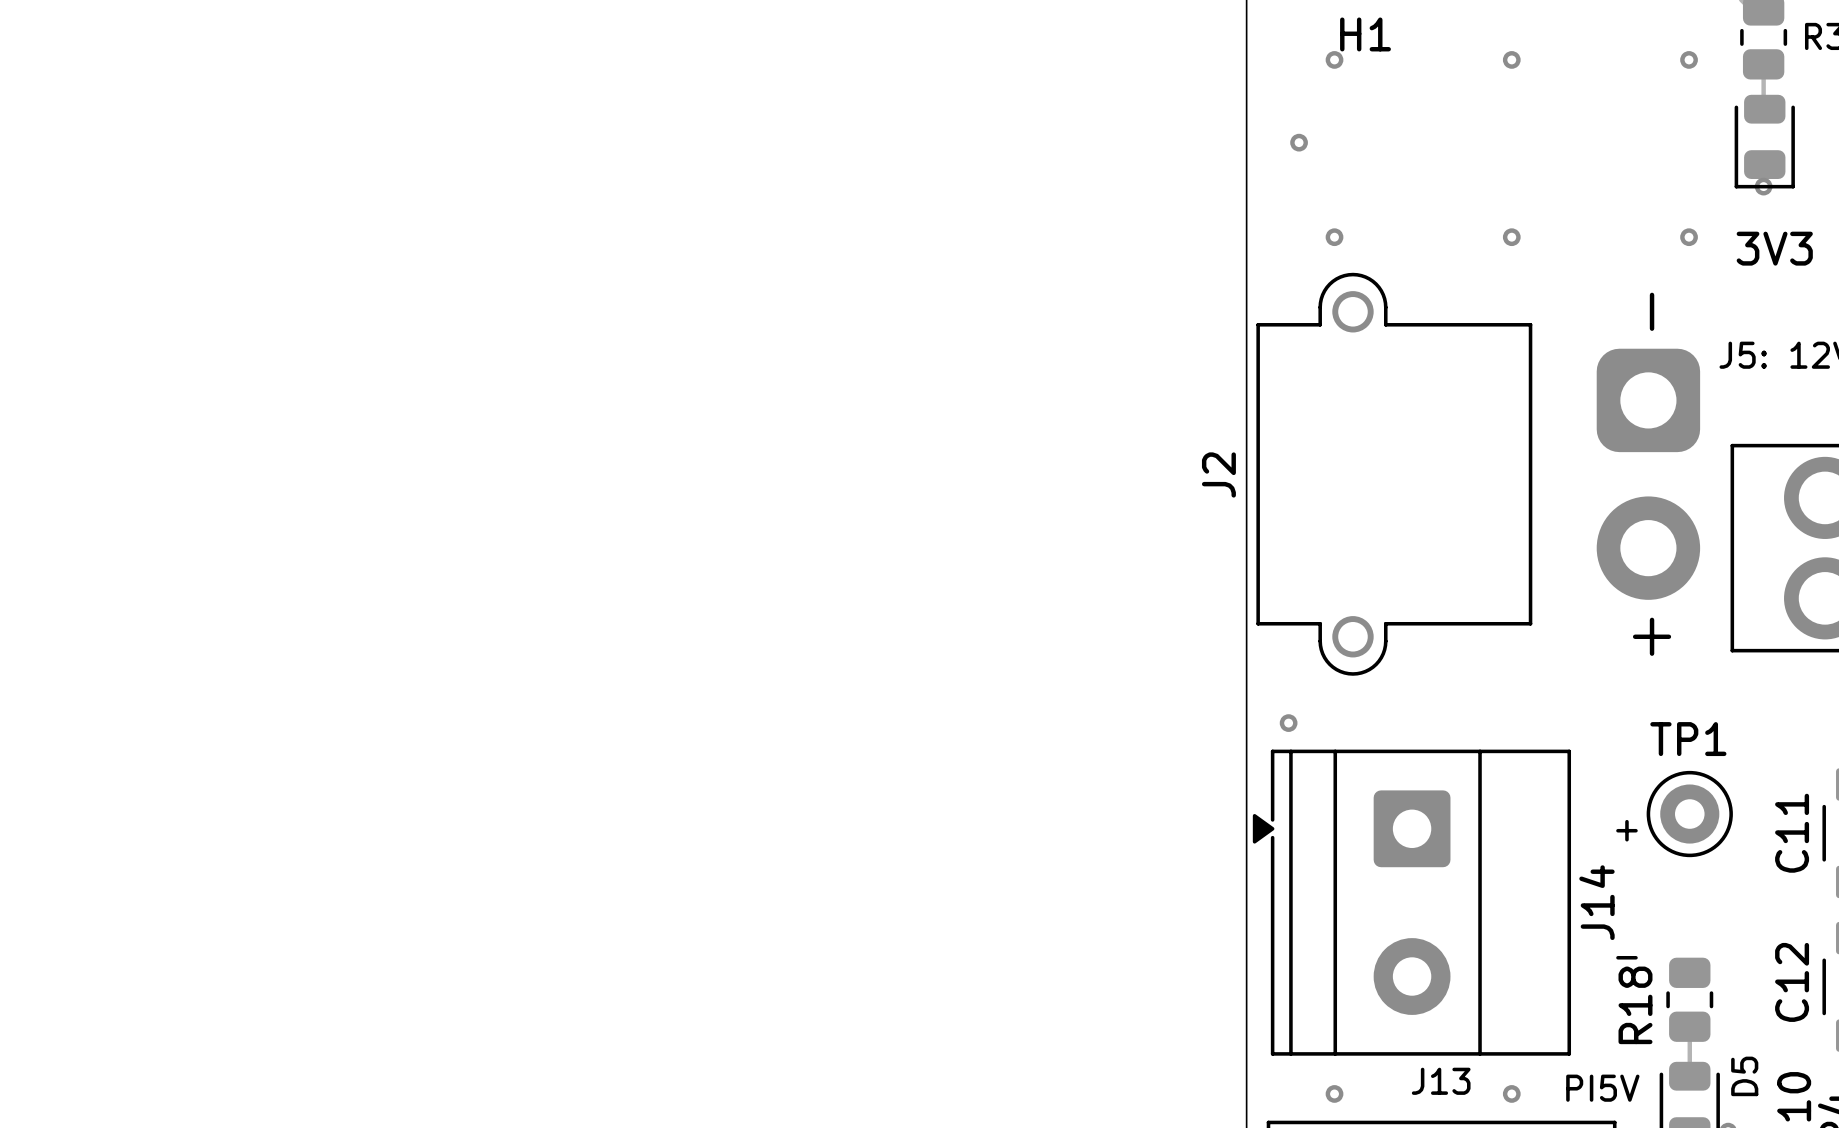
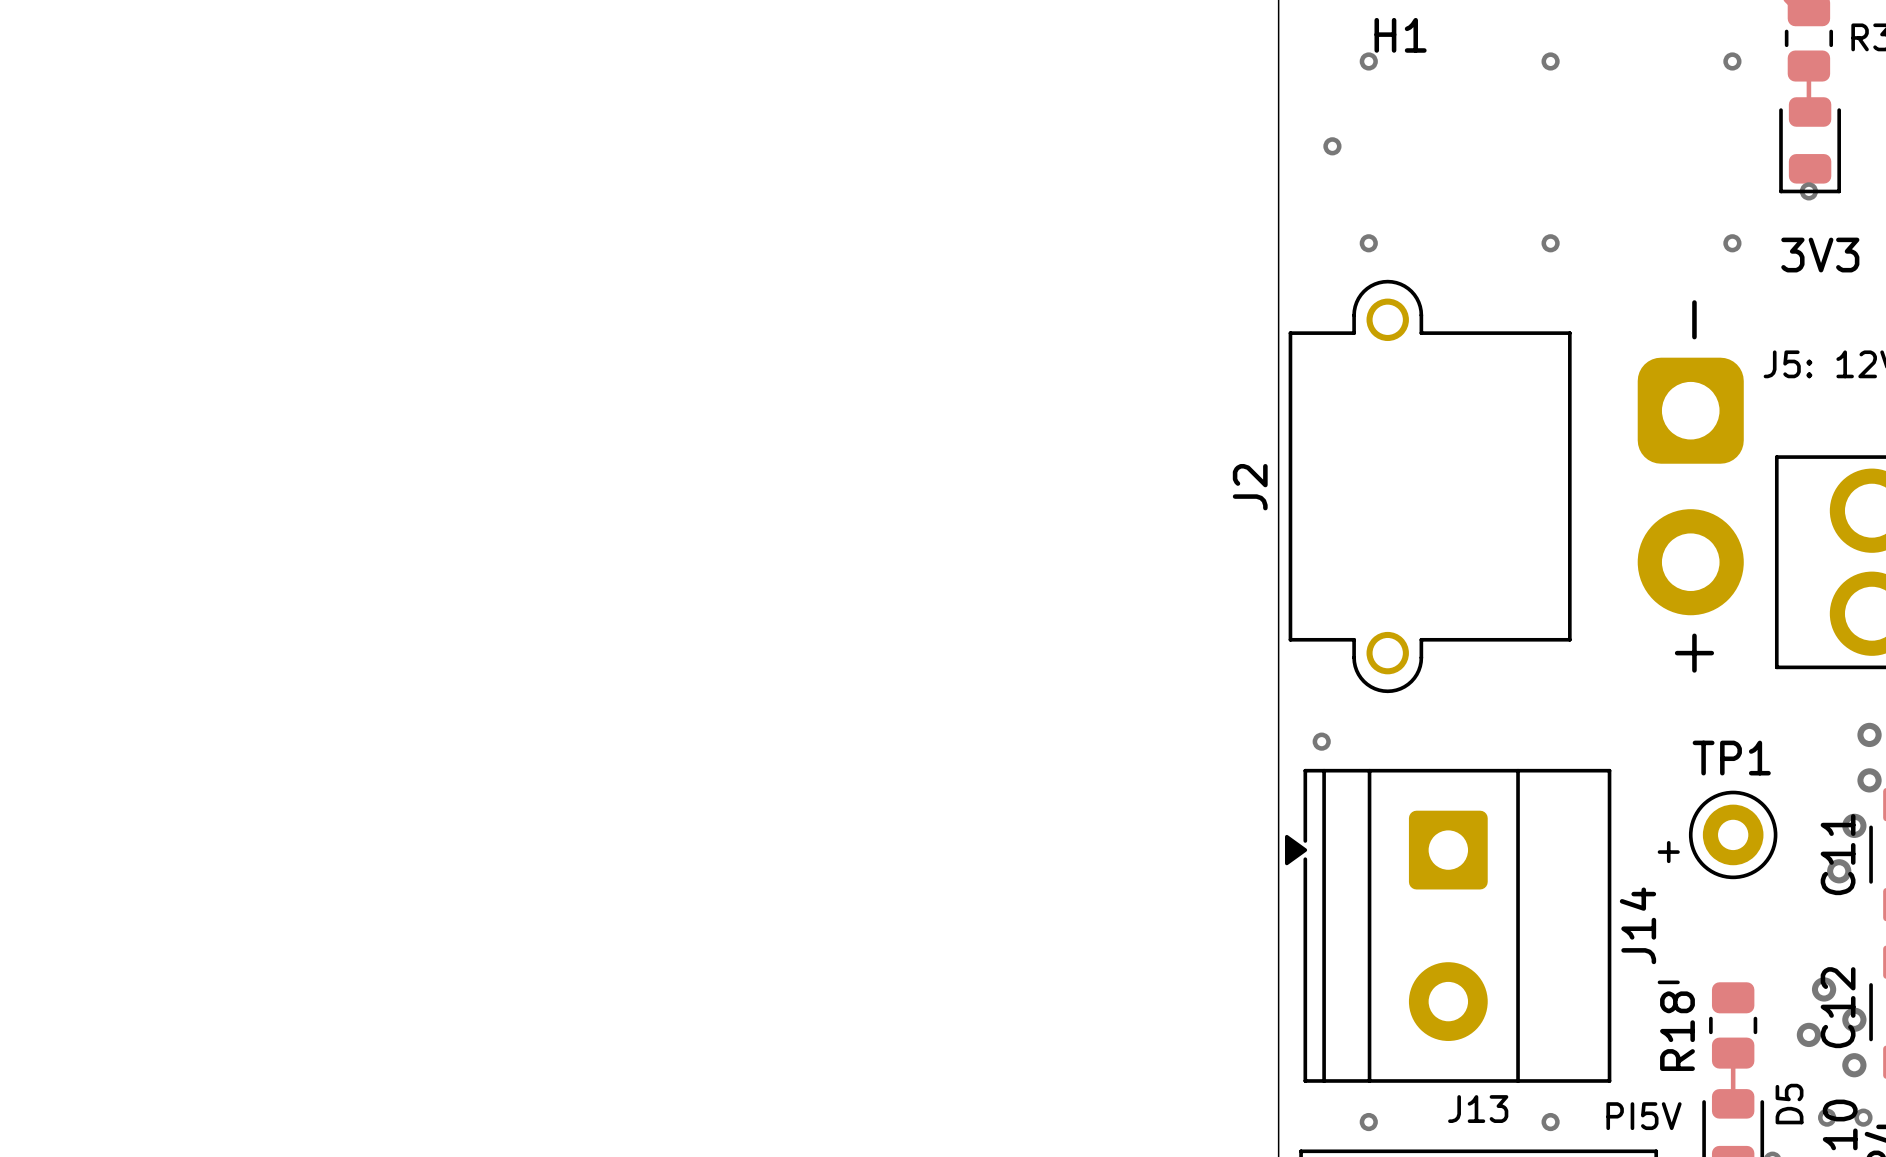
via: none -> (1869, 734)
via: none -> (1869, 780)
via: none -> (1854, 825)
via: none -> (1839, 871)
via: none -> (1824, 989)
via: none -> (1854, 1019)
via: none -> (1808, 1034)
via: none -> (1854, 1065)
via: none -> (1827, 1117)
via: none -> (1863, 1117)

